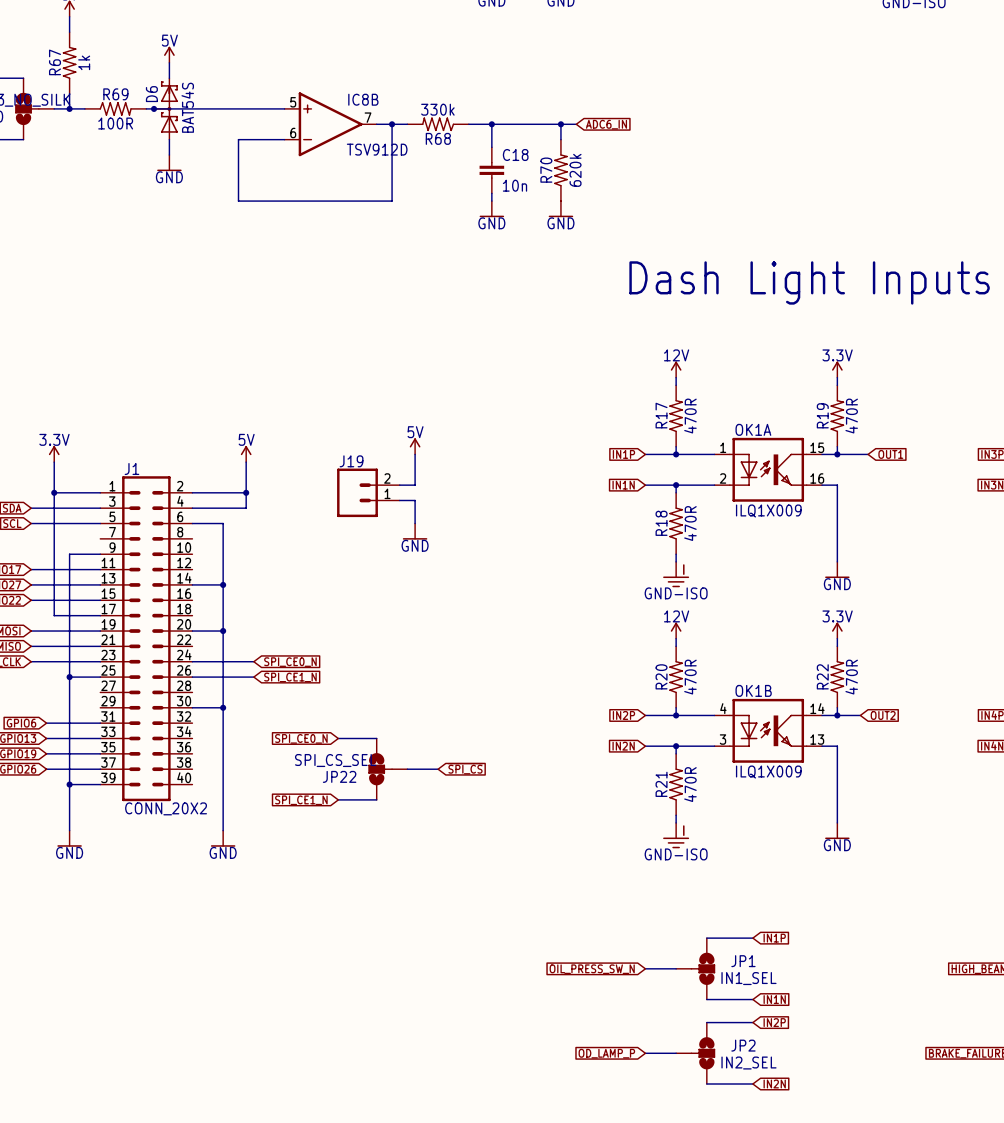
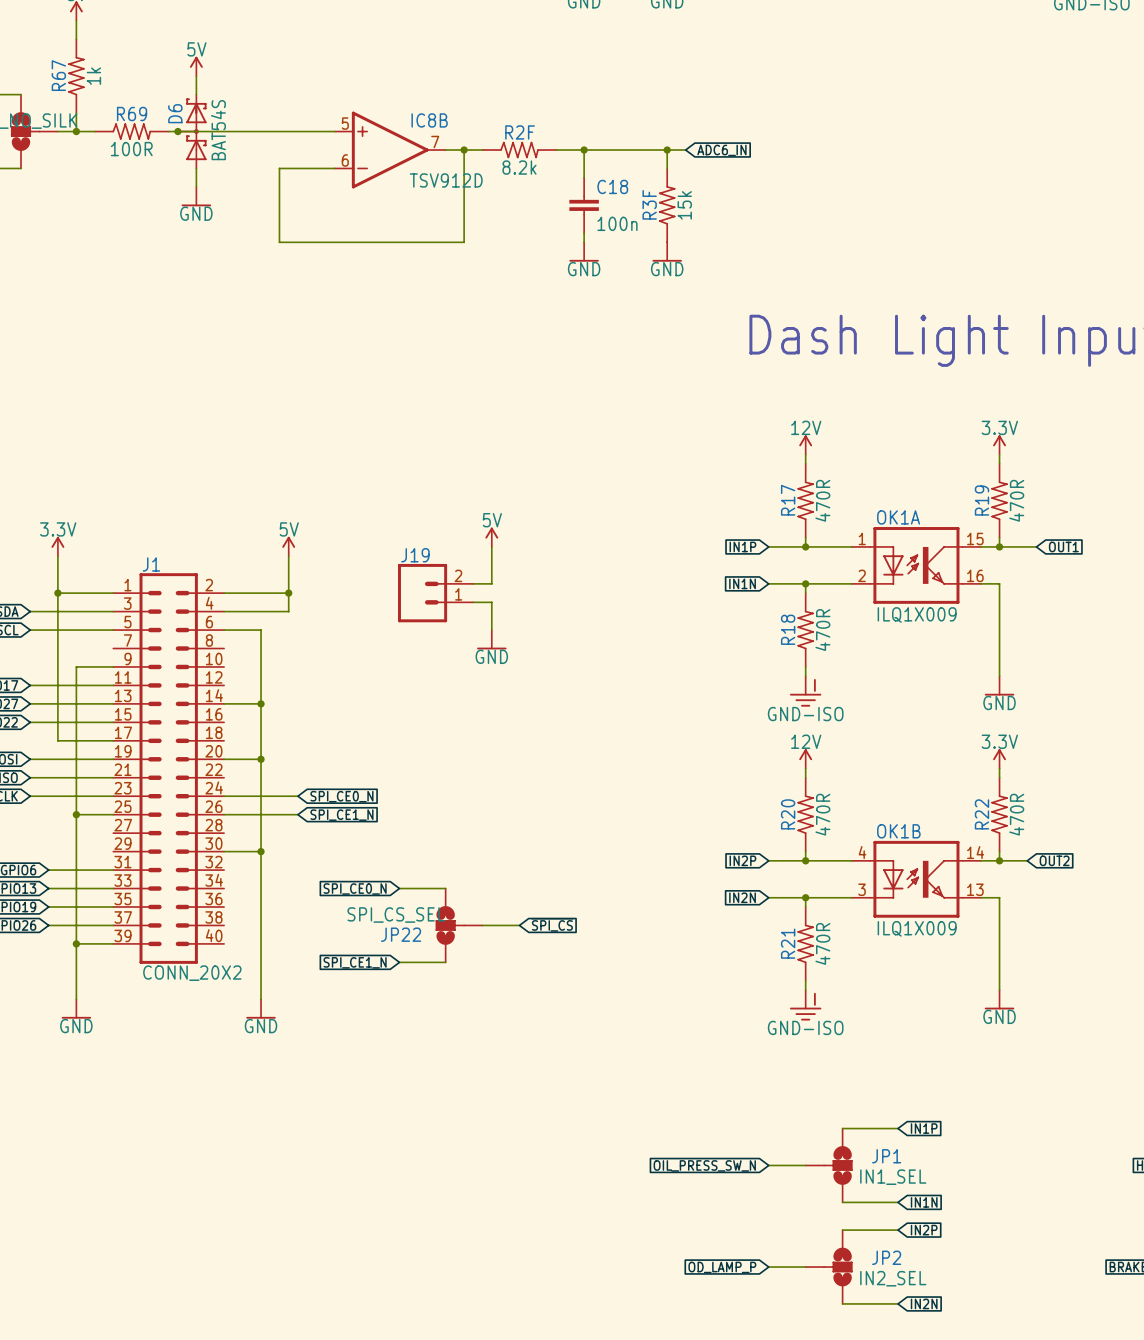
R68: 330k (438, 124) -> none
R2F: none -> 8.2k (519, 150)
R70 name: R70 (546, 170) -> R3F (649, 204)
R70 value: 620k (575, 170) -> 15k (684, 205)
C18 value: 10n (515, 185) -> 100n (617, 223)

